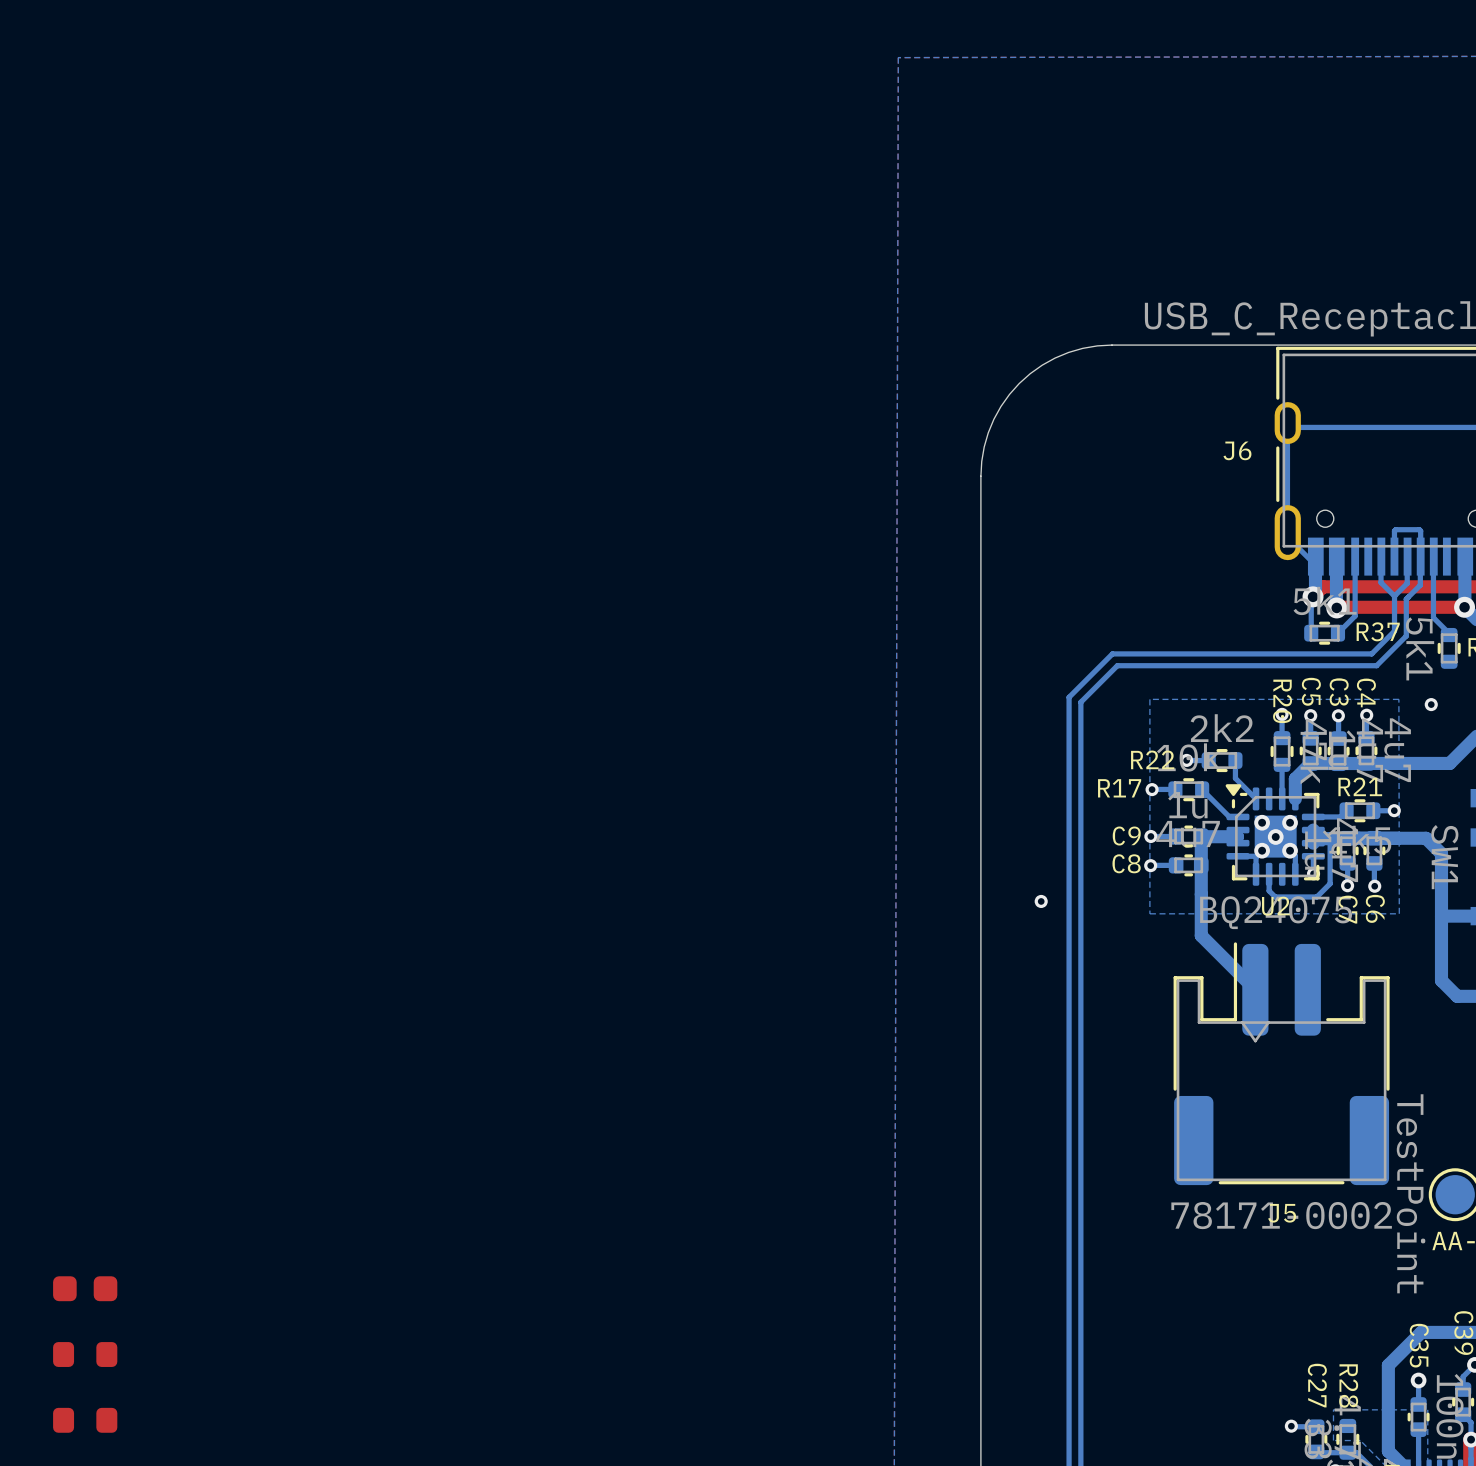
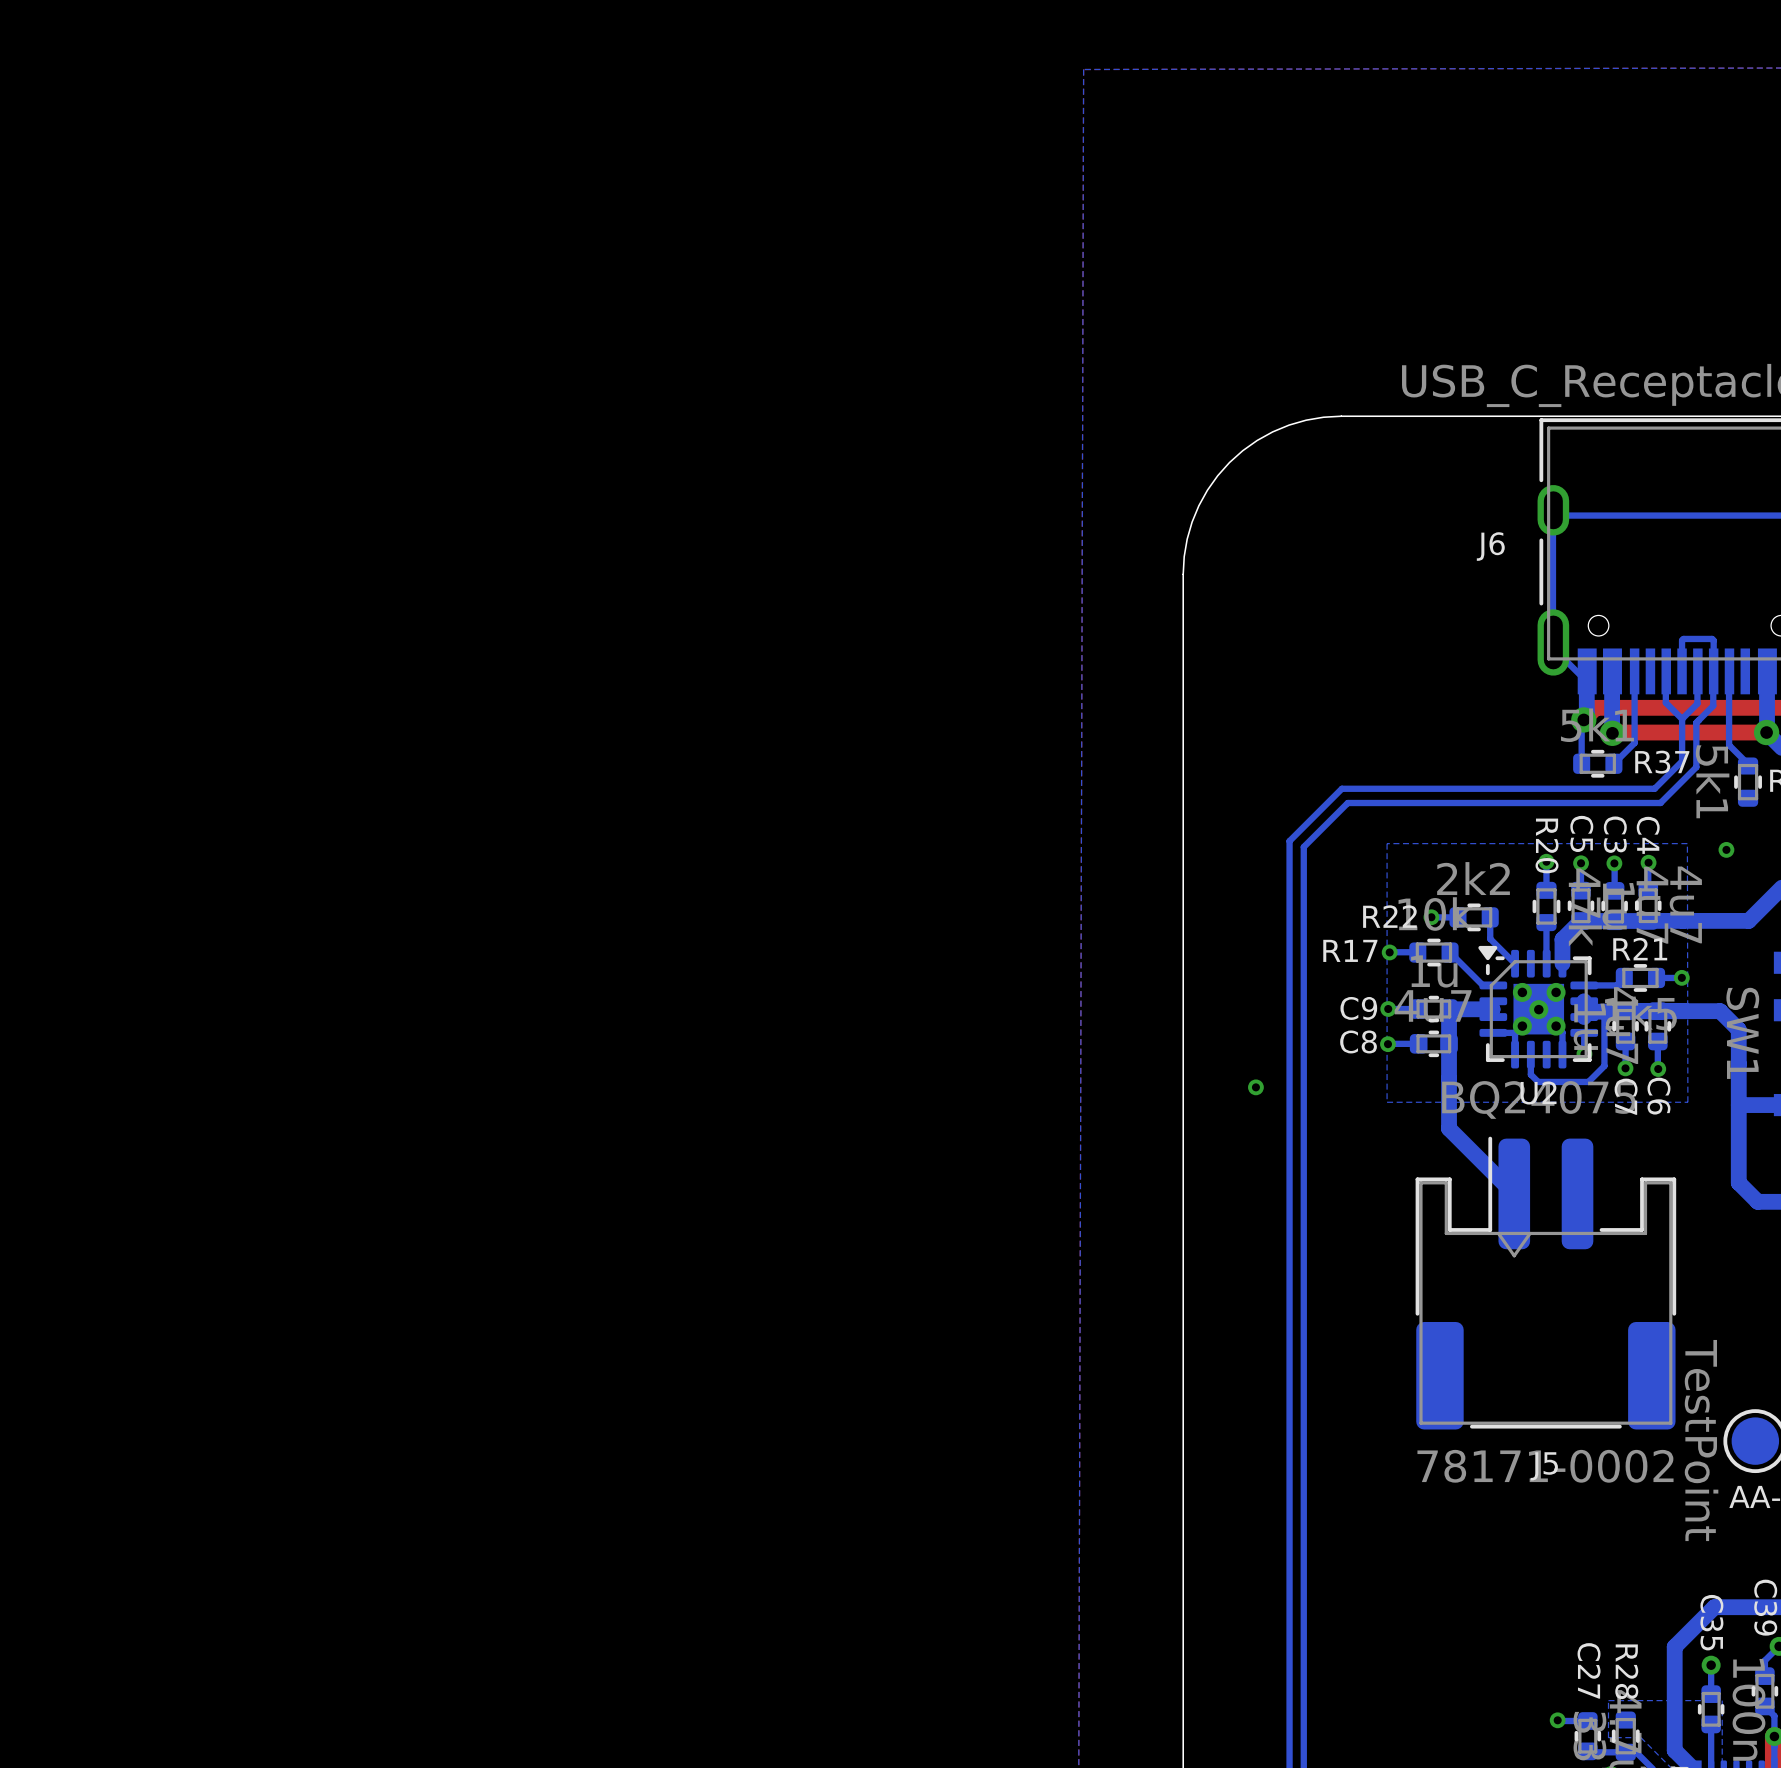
part: (85, 1288) -> none
part: (85, 1354) -> none
part: (85, 1420) -> none

